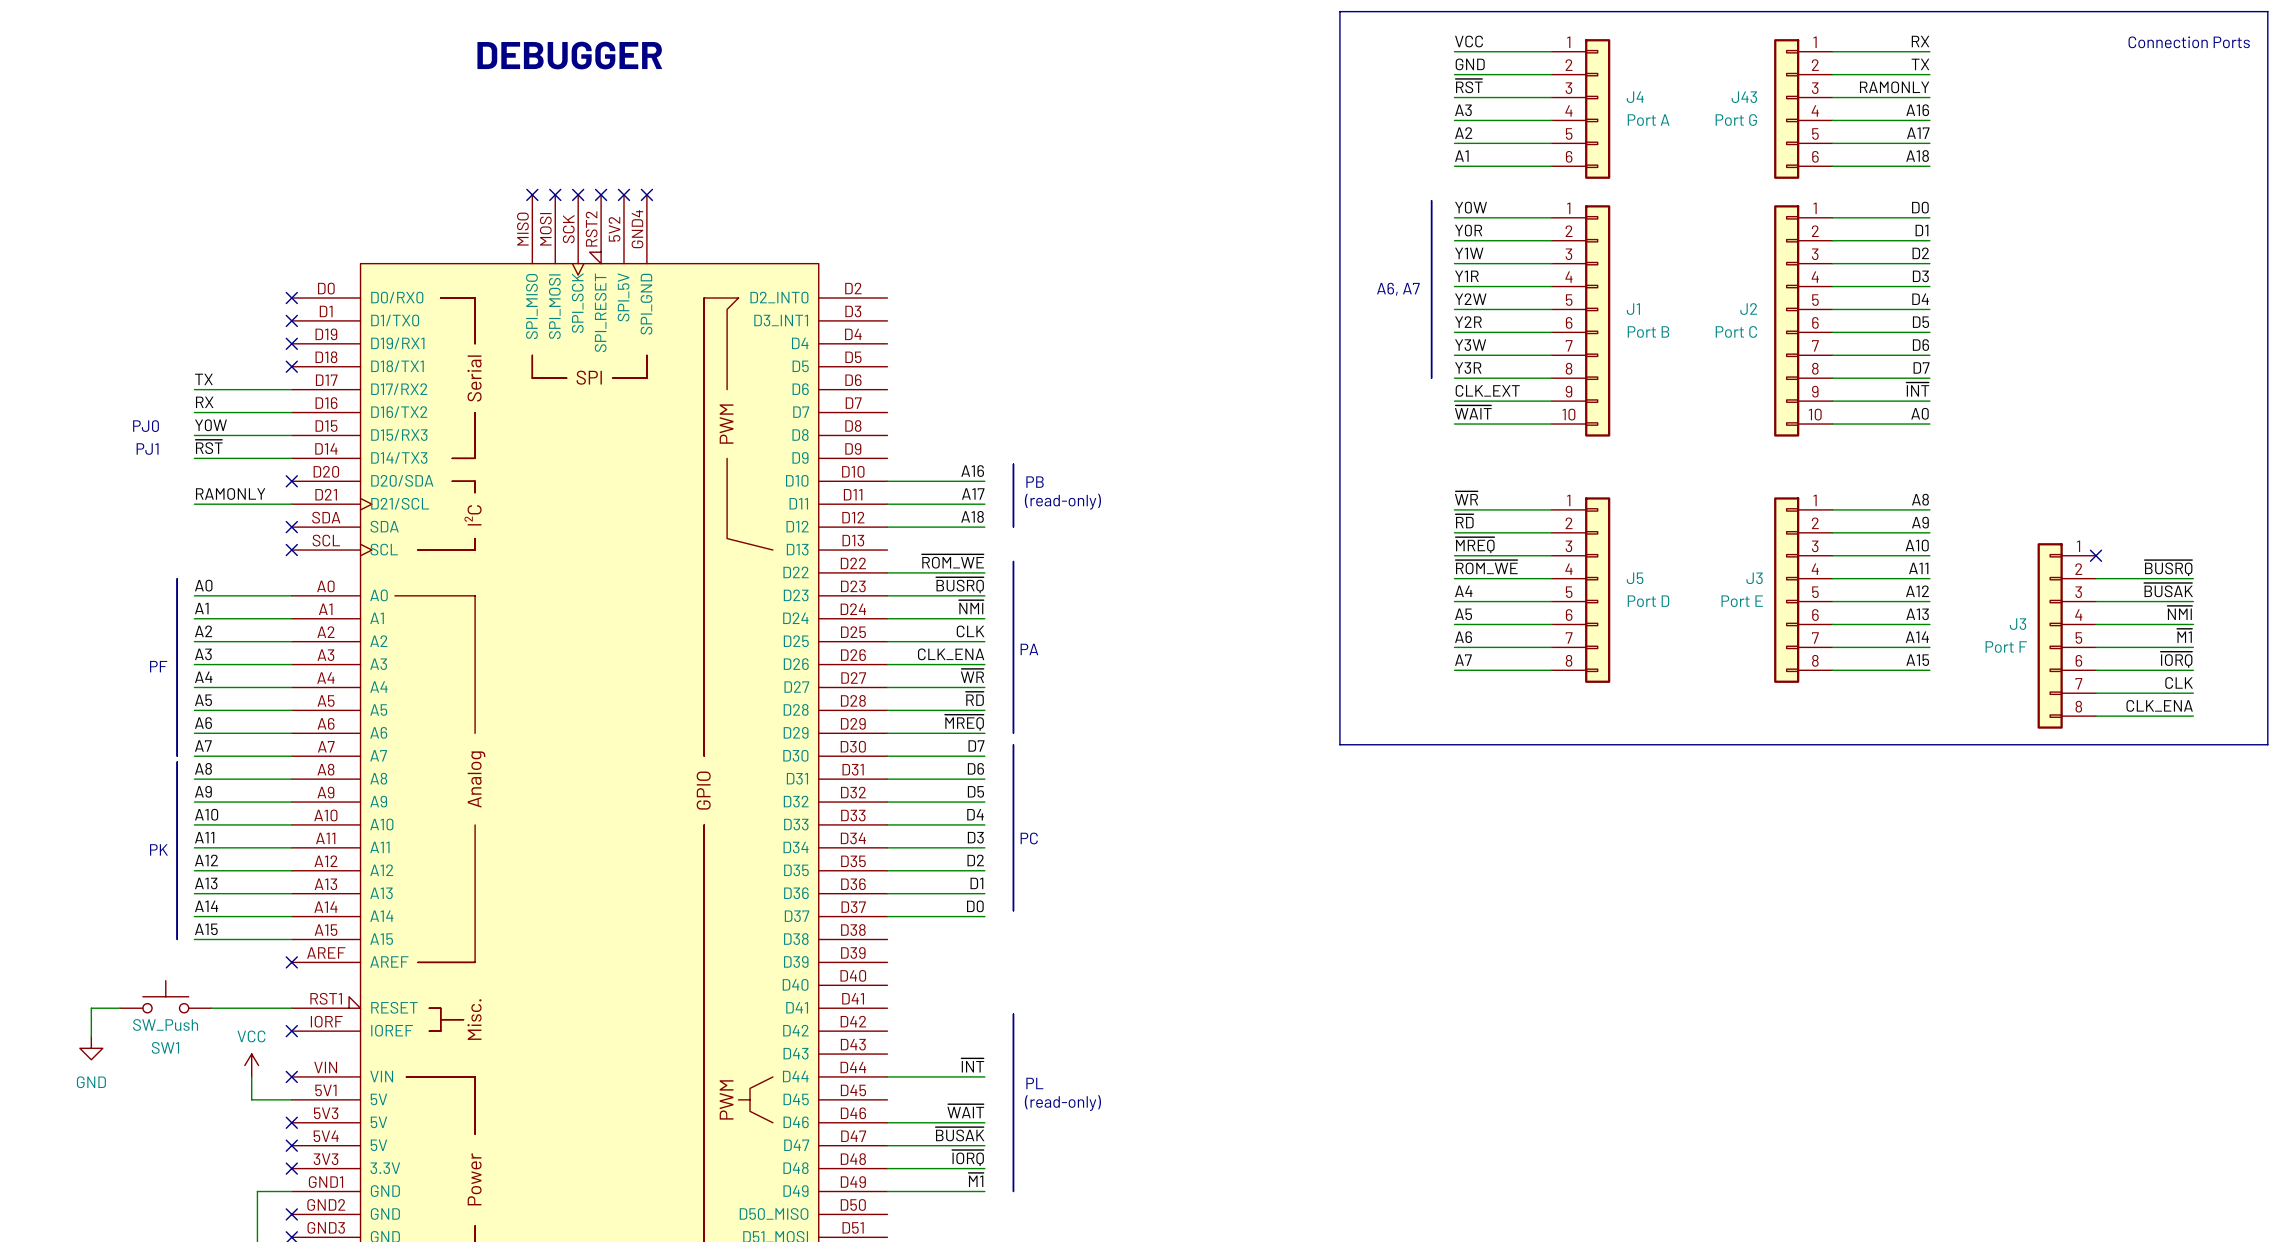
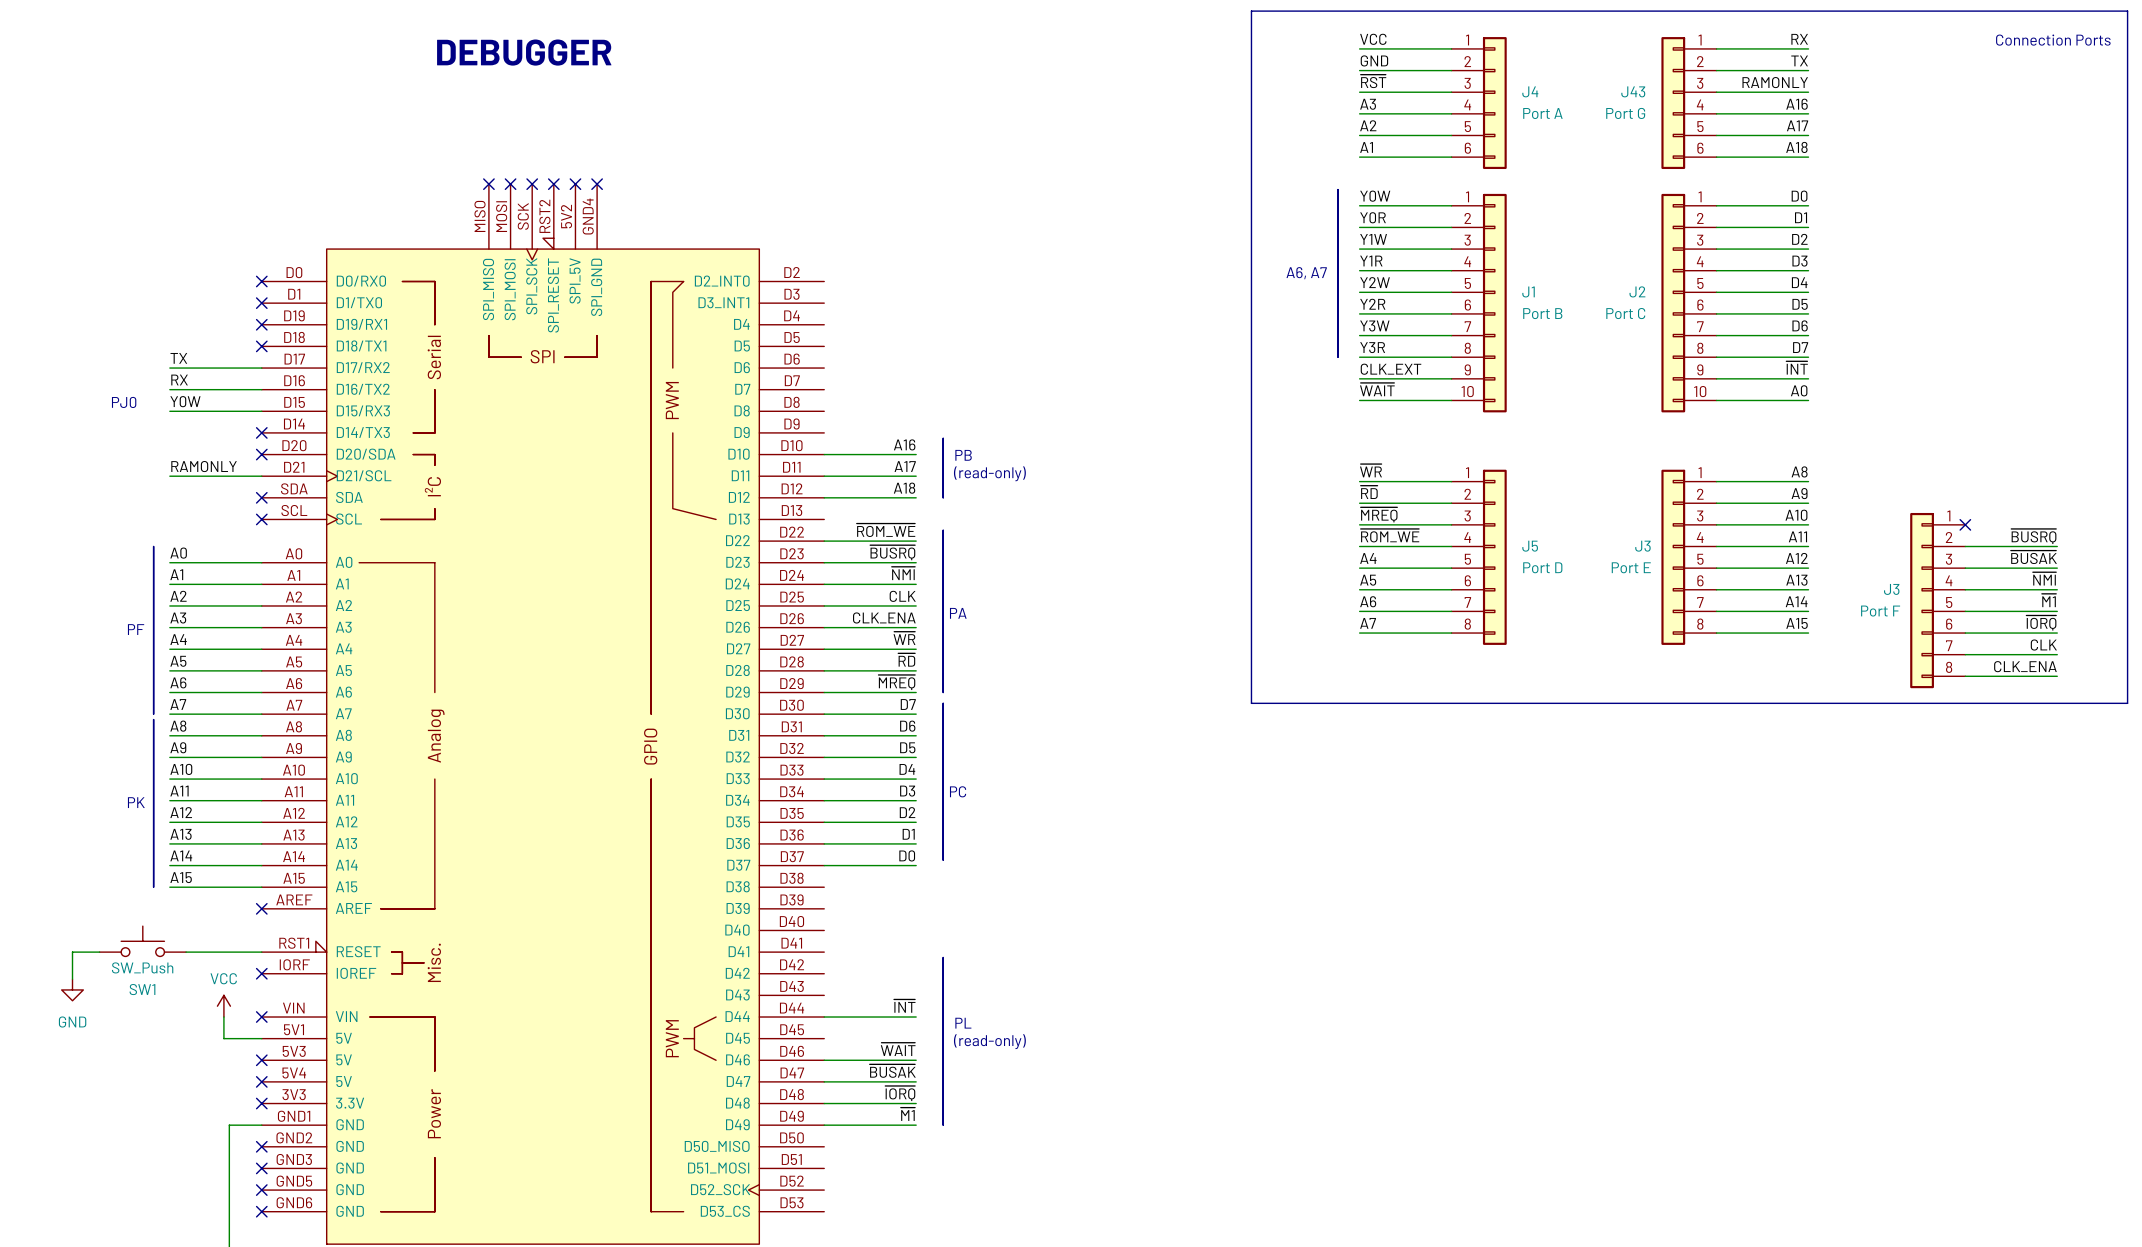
label: ~{RST} (209, 446) -> none
text: PJ1 (147, 449) -> none
wire: (194, 458) (291, 458) -> none
no-connect mark: none -> (261, 432)

